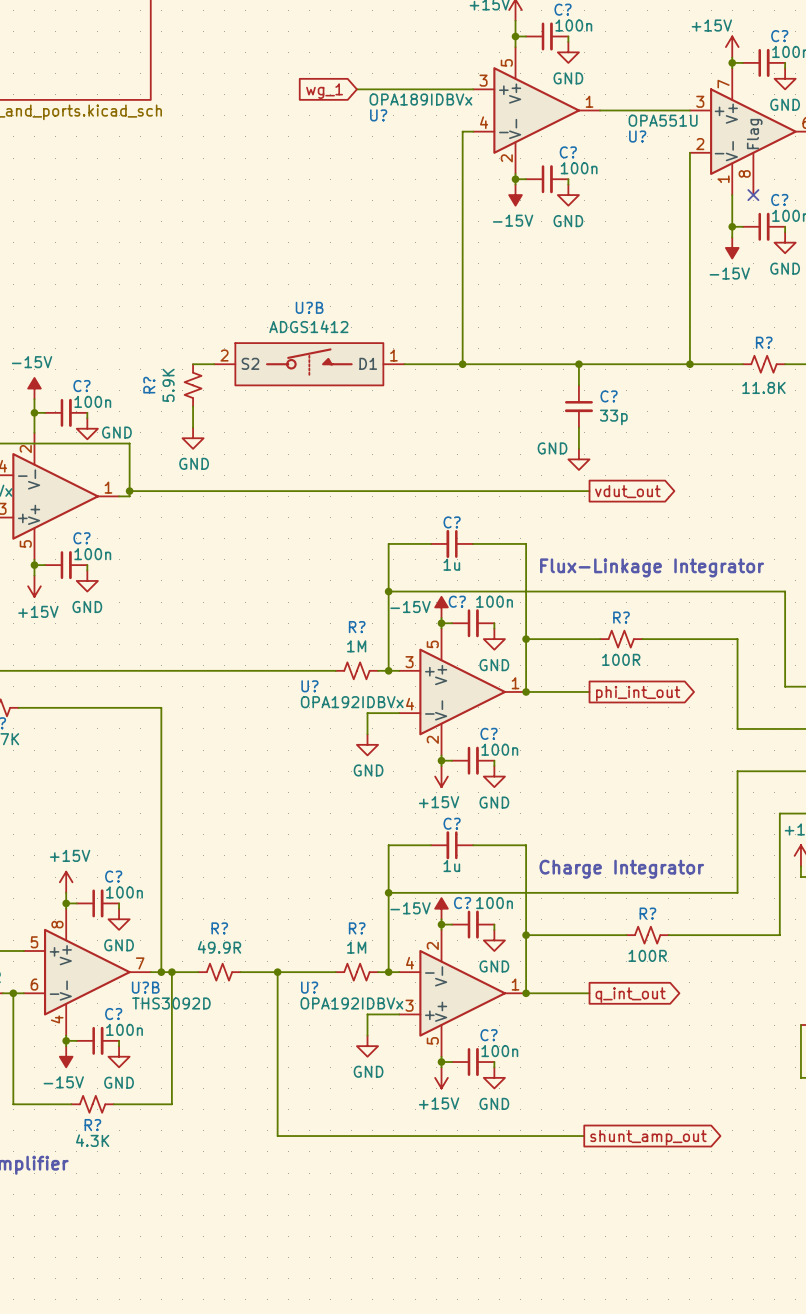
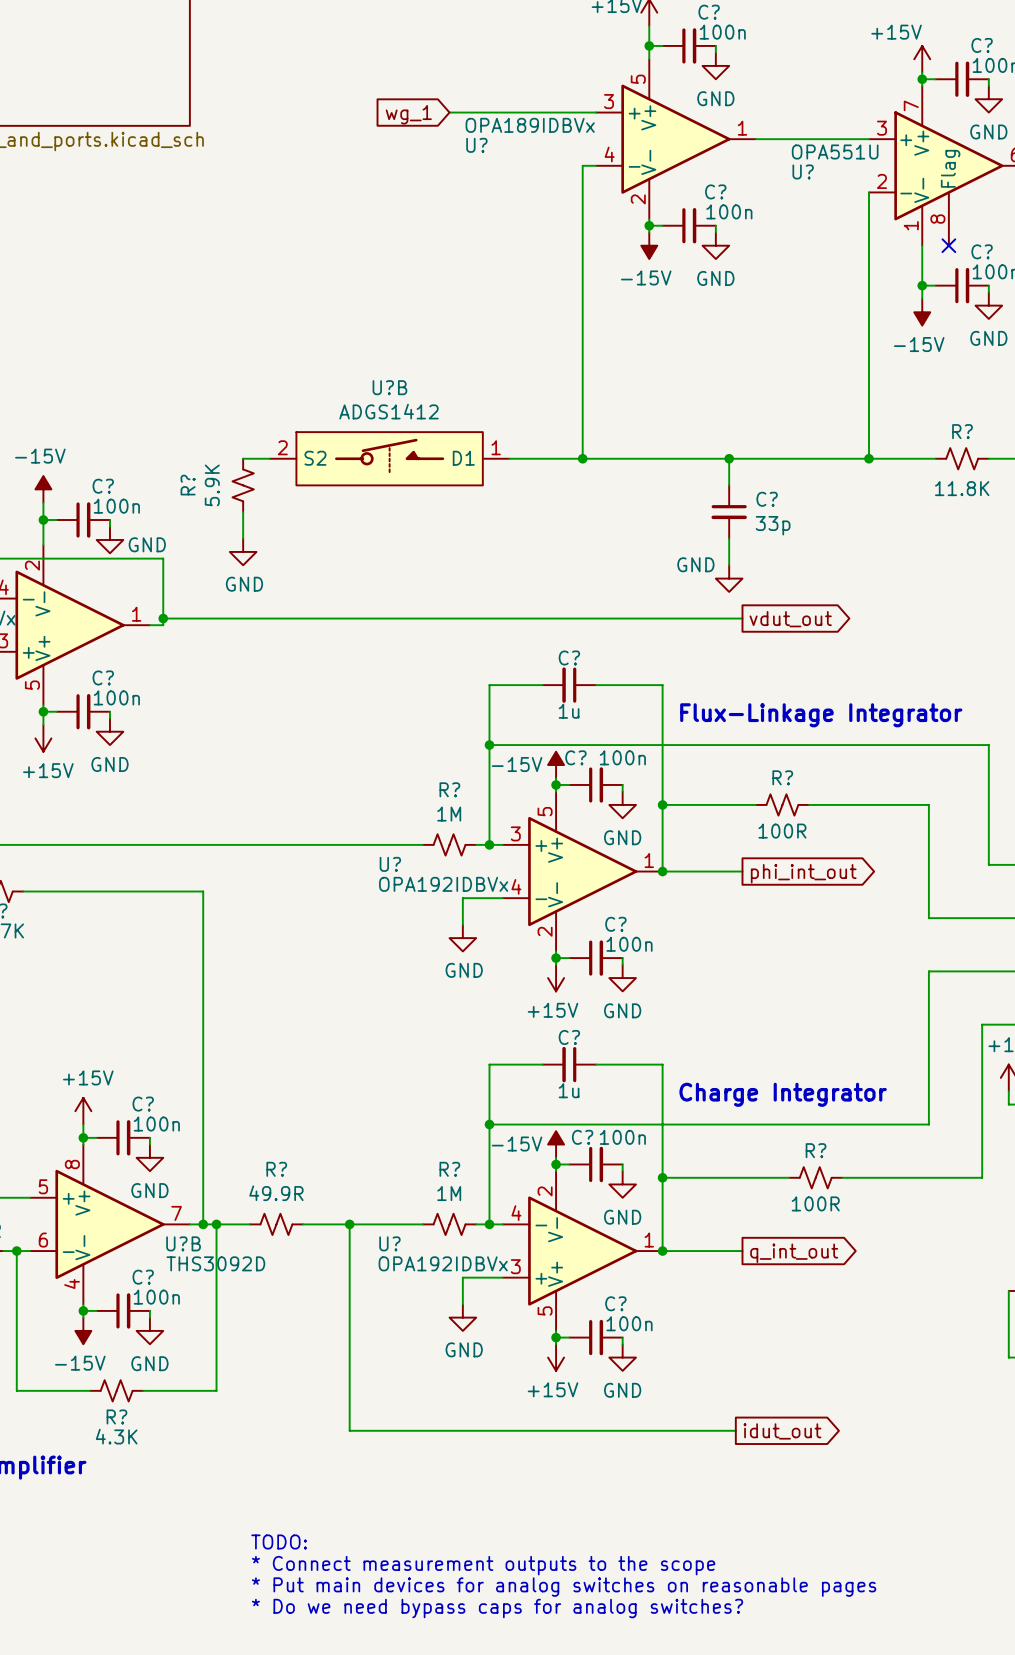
global label: shunt_amp_out (648, 1137) -> idut_out (782, 1431)
text: none -> TODO: (279, 1541)
text: none -> * Connect measurement outputs to the scope (483, 1565)
text: none -> * Put main devices for analog switches on reasonable pages (564, 1587)
text: none -> * Do we need bypass caps for analog switches? (497, 1608)

